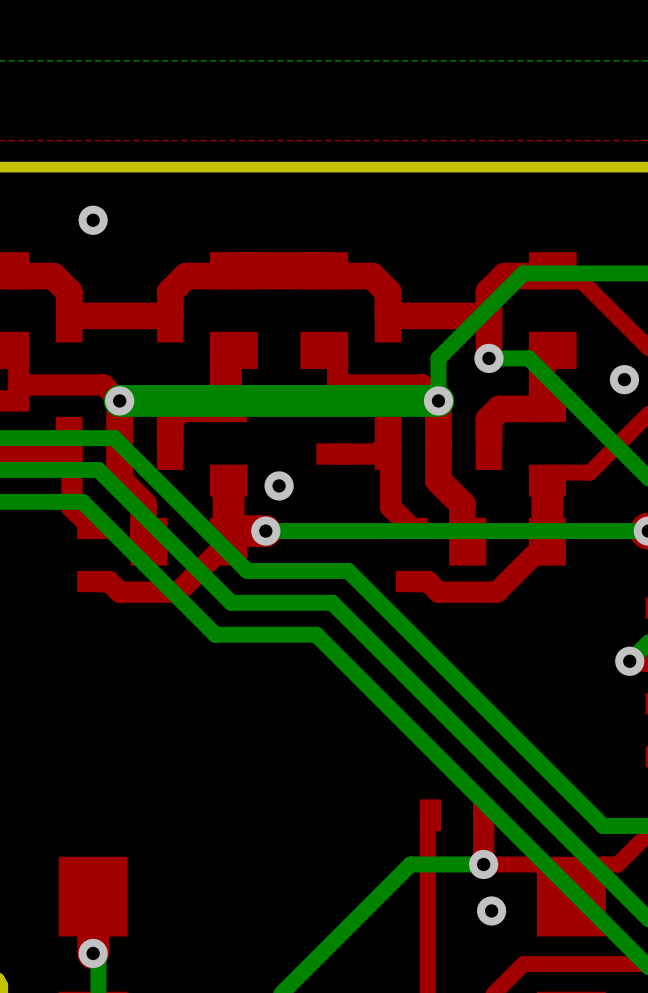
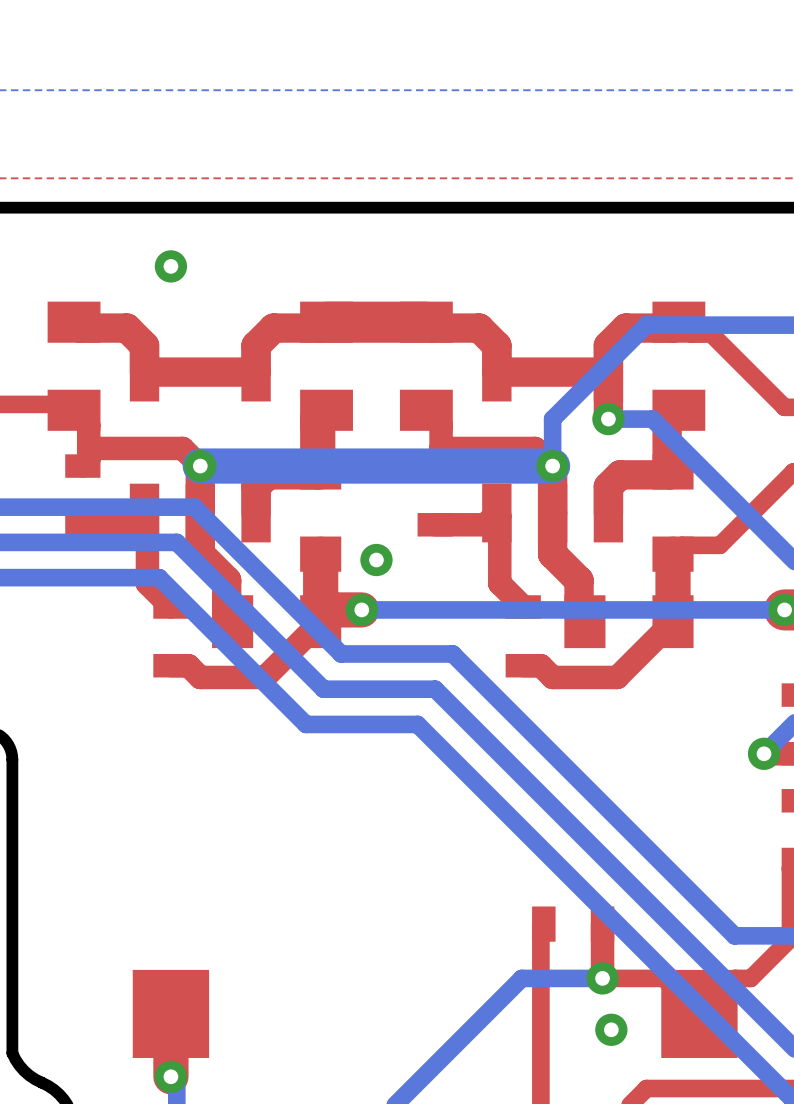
via: (624, 379) -> none

